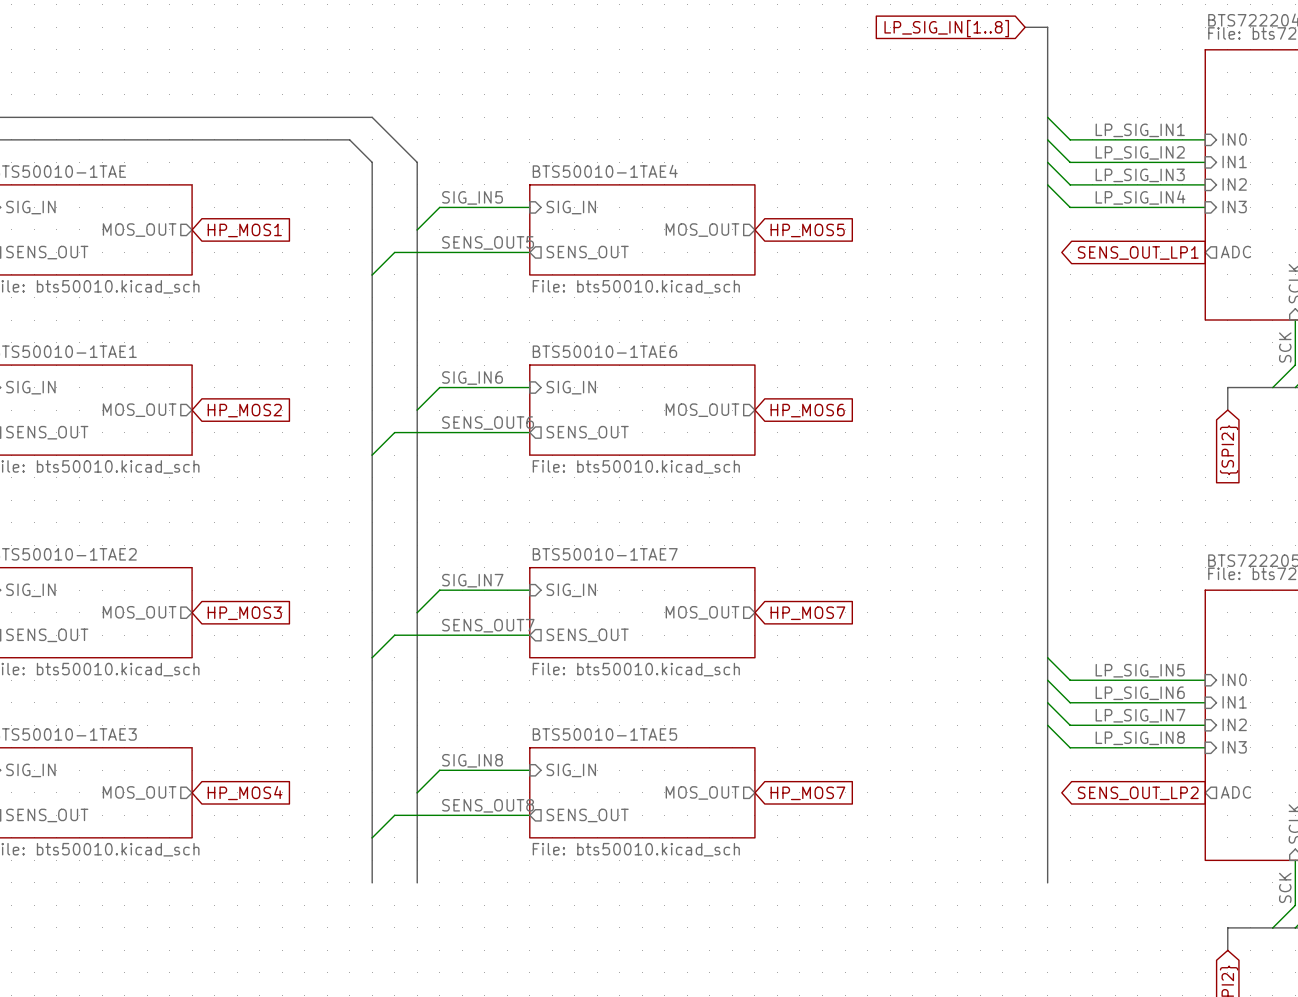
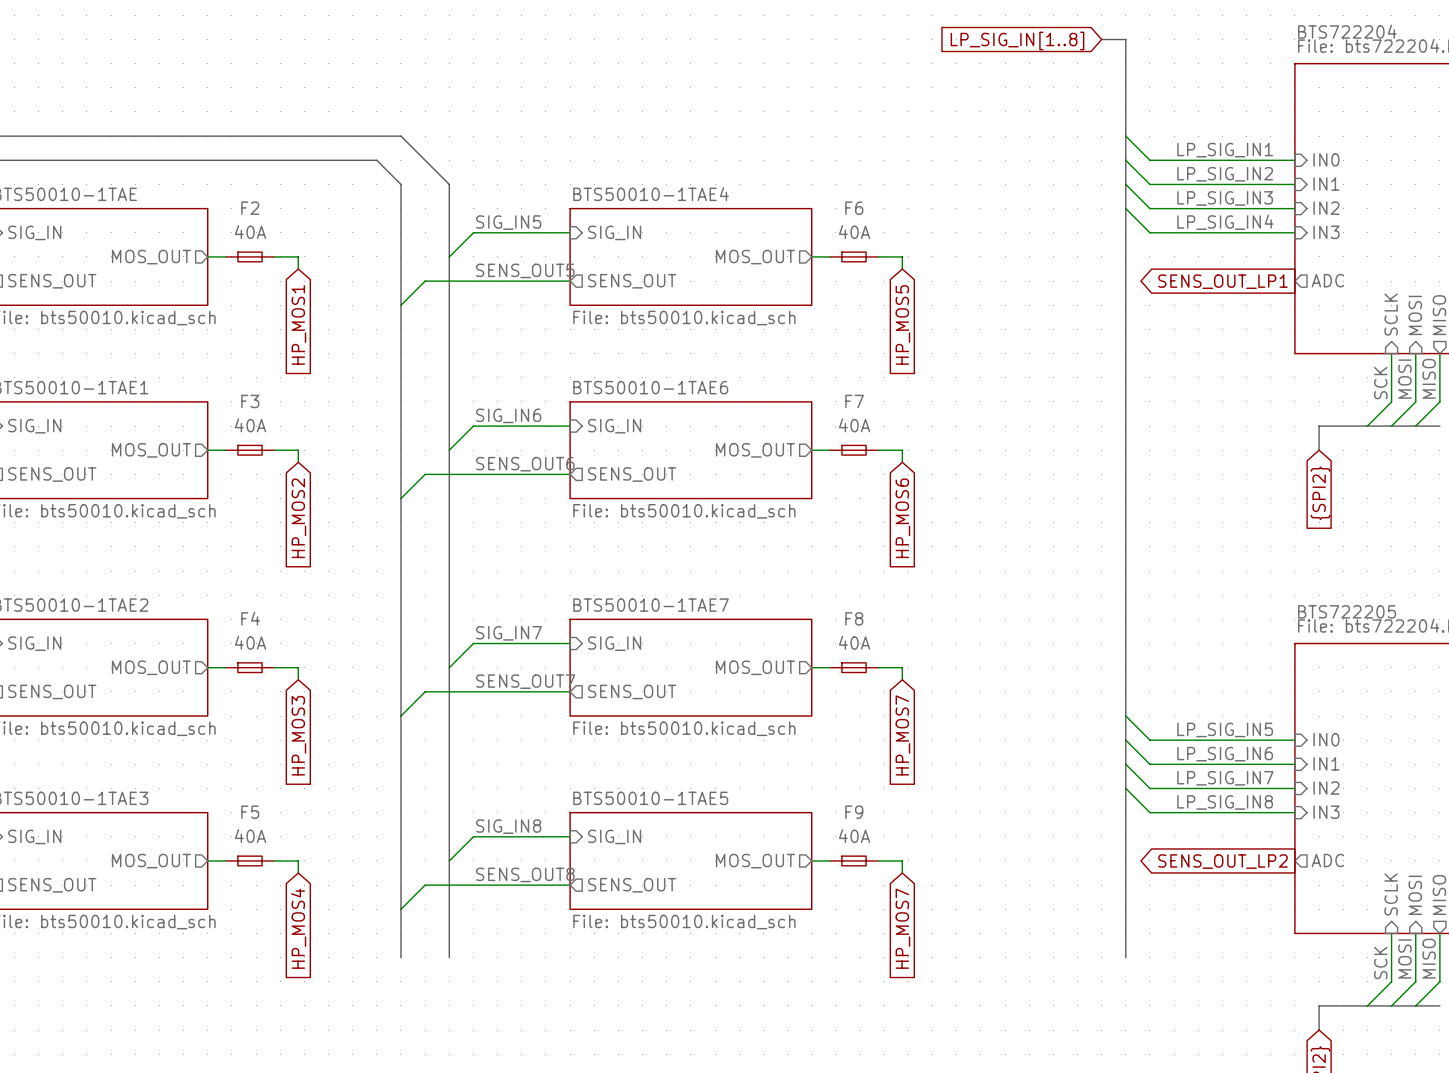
wire: none -> (207, 256) (225, 256)
F2: none -> 40A (249, 256)
wire: none -> (274, 256) (298, 256) (298, 269)
wire: none -> (811, 256) (829, 256)
F6: none -> 40A (854, 256)
wire: none -> (878, 256) (902, 256) (902, 269)
global label rotation: 0° (244, 230) -> 90° clockwise (298, 324)
global label rotation: 0° (807, 230) -> 90° clockwise (902, 324)
wire: none -> (207, 450) (225, 450)
F3: none -> 40A (249, 450)
global label rotation: 0° (244, 410) -> 90° clockwise (298, 518)
wire: none -> (274, 450) (298, 450) (298, 462)
wire: none -> (811, 450) (829, 450)
F7: none -> 40A (854, 450)
global label rotation: 0° (807, 410) -> 90° clockwise (902, 518)
wire: none -> (878, 450) (902, 450) (902, 462)
wire: none -> (207, 667) (225, 667)
F4: none -> 40A (249, 667)
wire: none -> (274, 667) (298, 667) (298, 679)
wire: none -> (811, 667) (829, 667)
F8: none -> 40A (854, 667)
wire: none -> (878, 667) (902, 667) (902, 679)
global label rotation: 0° (244, 613) -> 90° clockwise (298, 735)
global label rotation: 0° (807, 613) -> 90° clockwise (902, 735)
wire: none -> (207, 860) (225, 860)
F5: none -> 40A (249, 860)
wire: none -> (274, 860) (298, 860) (298, 873)
wire: none -> (811, 860) (829, 860)
F9: none -> 40A (854, 860)
wire: none -> (878, 860) (902, 860) (902, 873)
global label rotation: 0° (245, 793) -> 90° clockwise (298, 928)
global label rotation: 0° (807, 793) -> 90° clockwise (902, 928)

